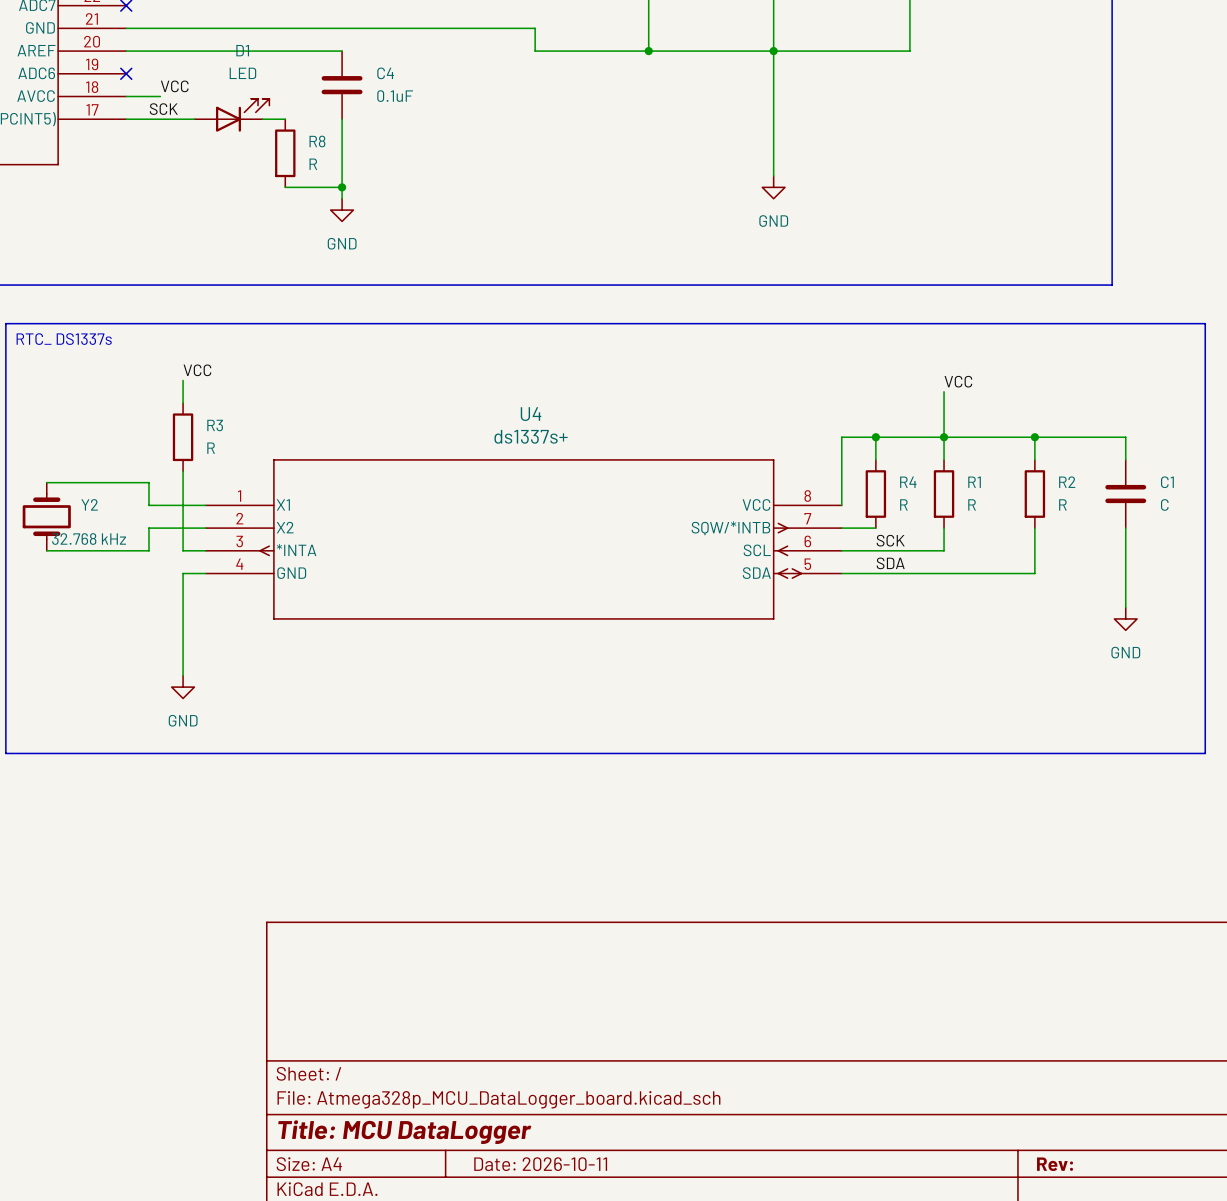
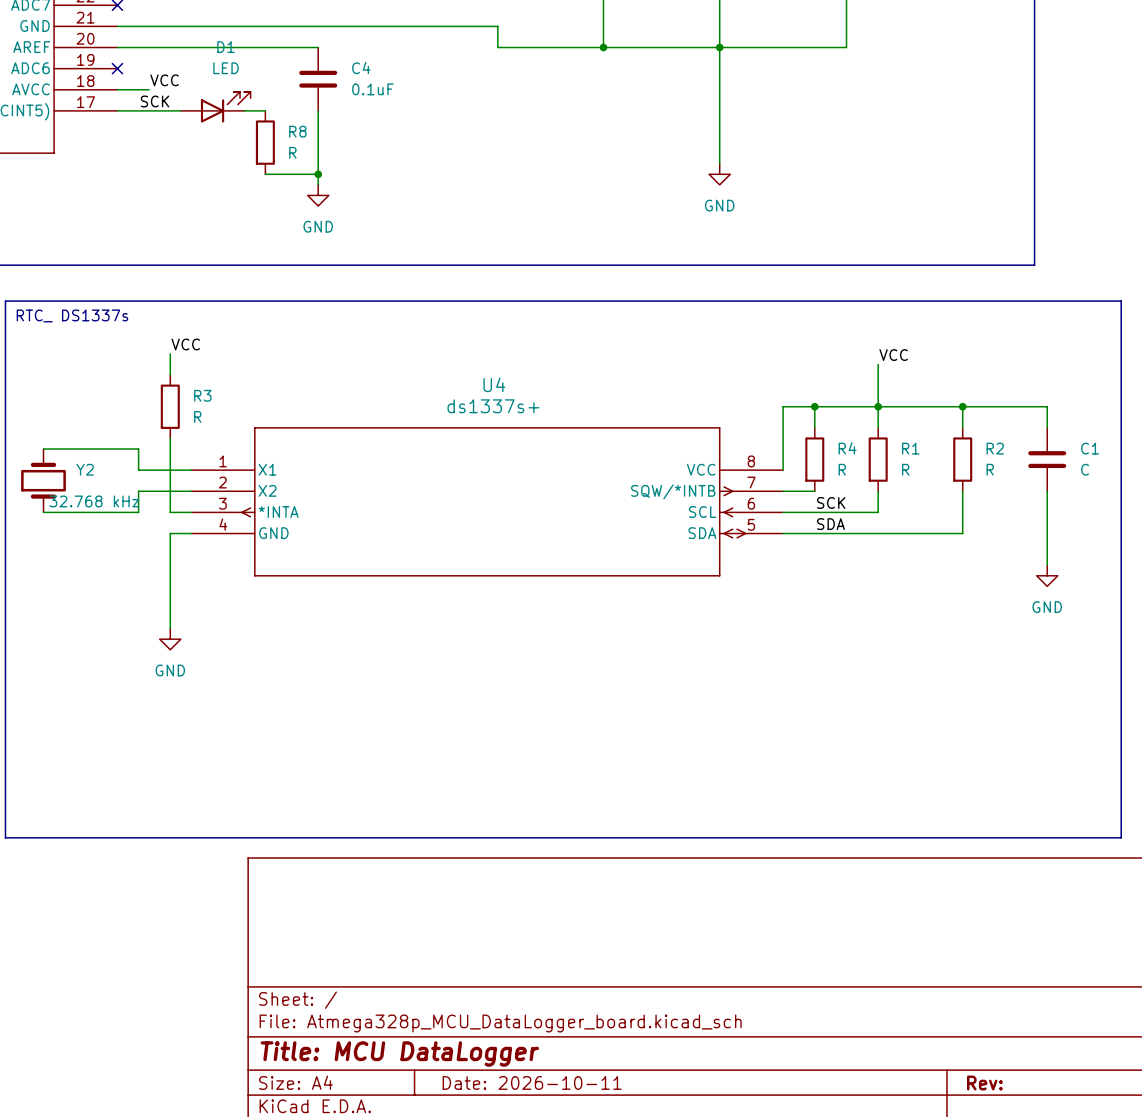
line: (5, 753) (1205, 753) -> (5, 700) (5, 837) (1121, 837) (1121, 700)

